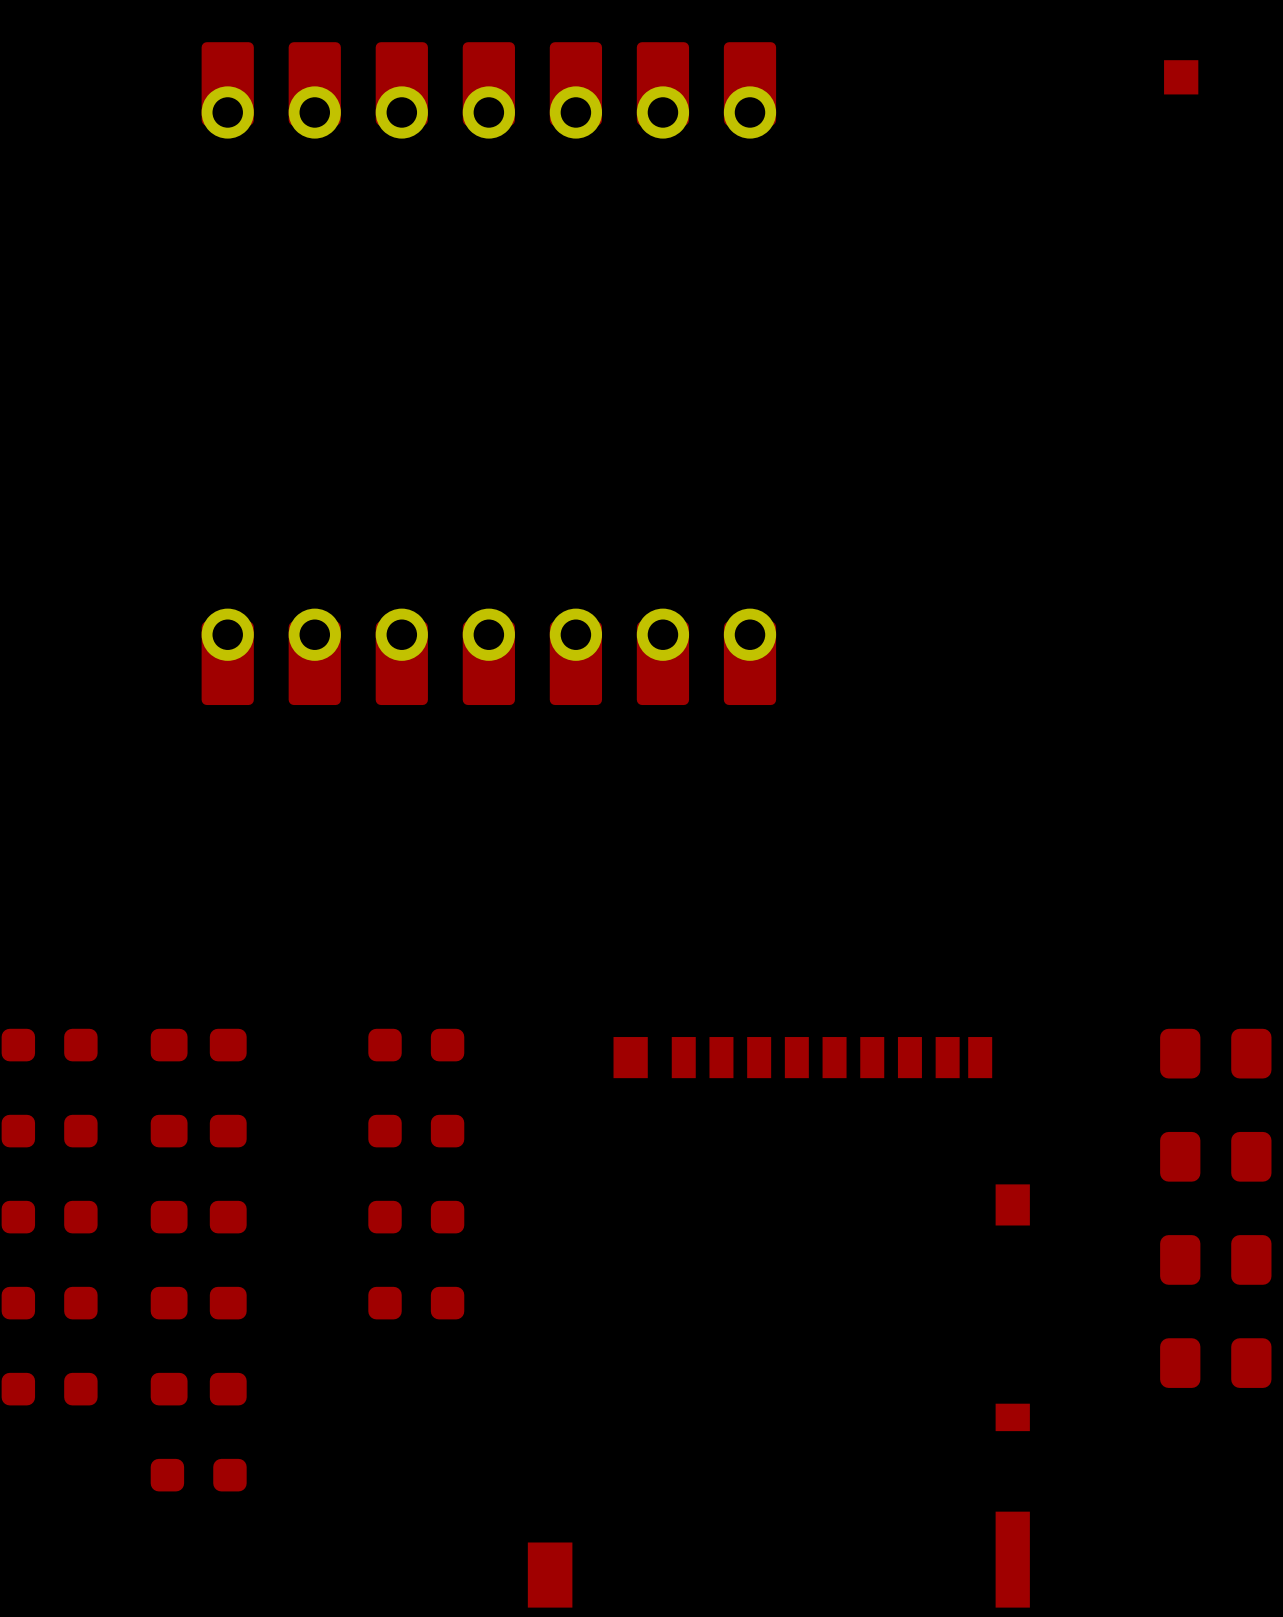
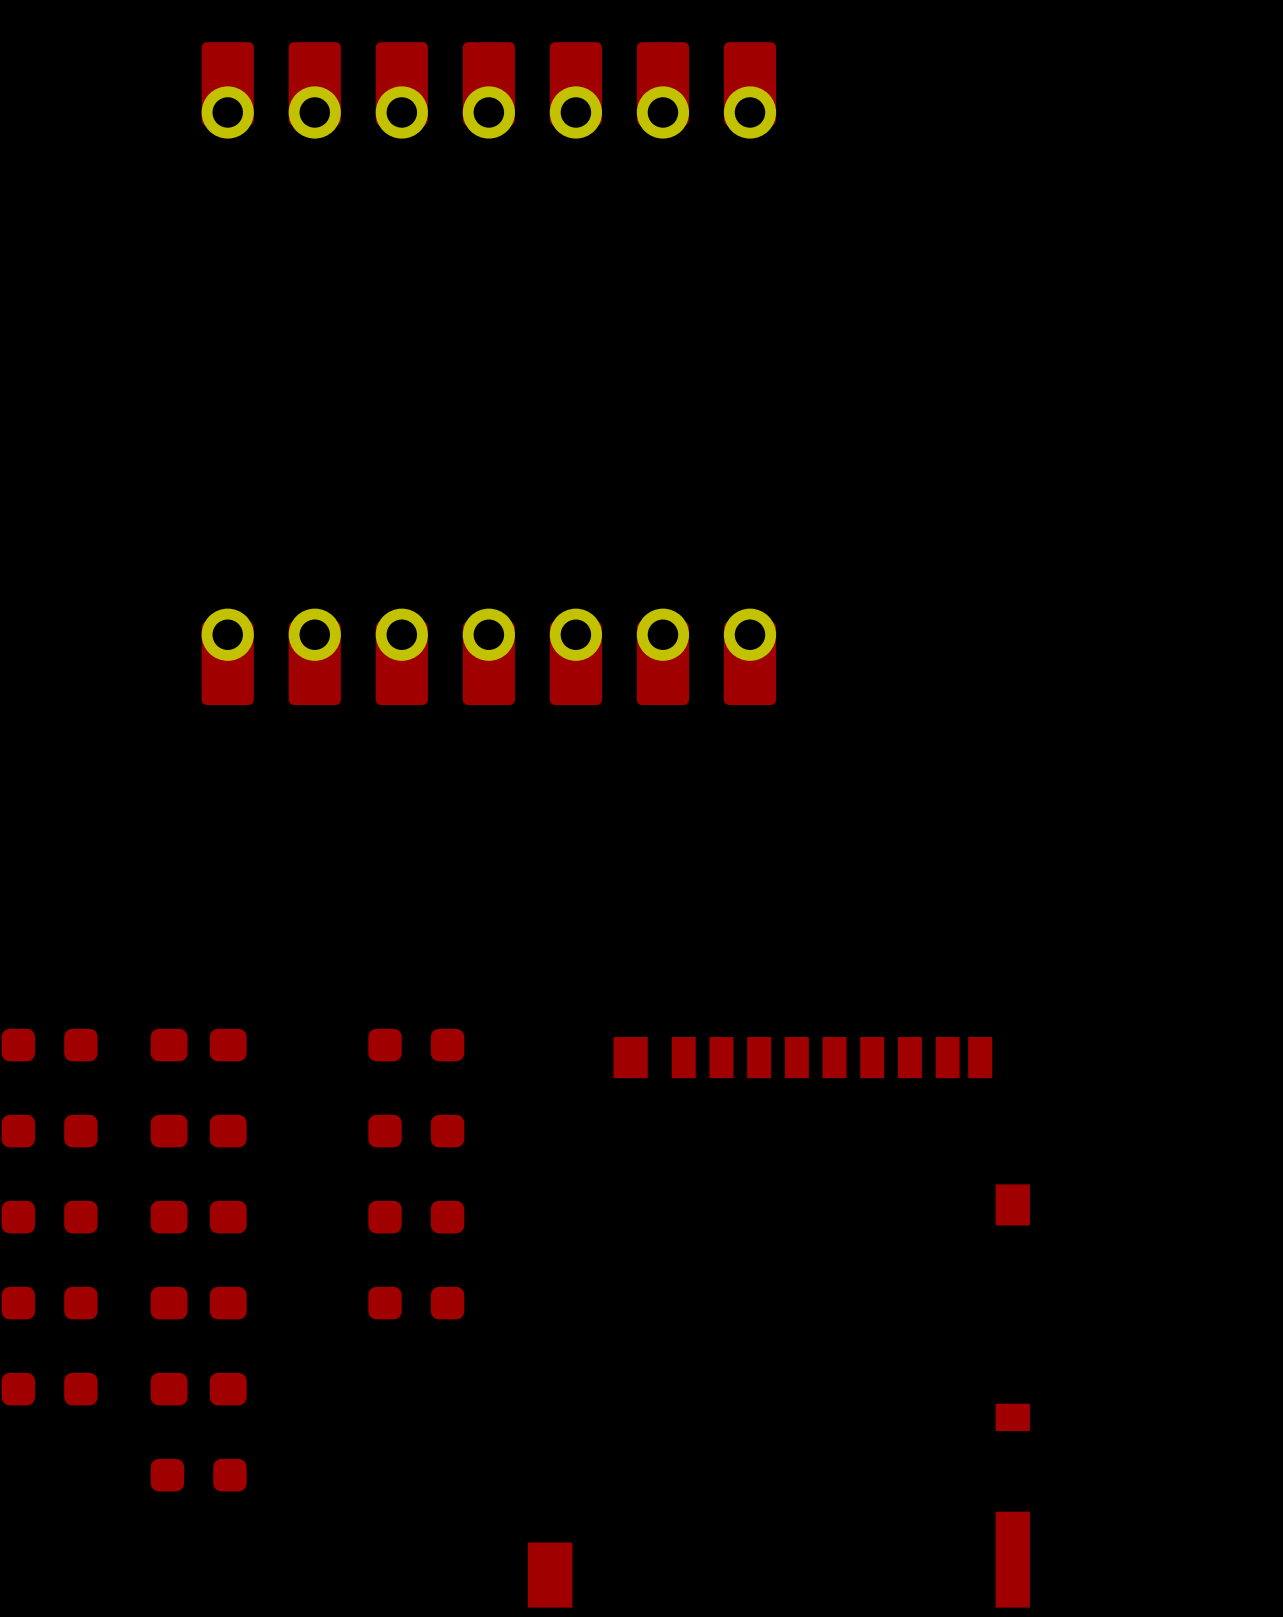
part: (1181, 77) -> none
part: (1215, 1053) -> none
part: (1215, 1156) -> none
part: (1215, 1259) -> none
part: (1215, 1363) -> none

